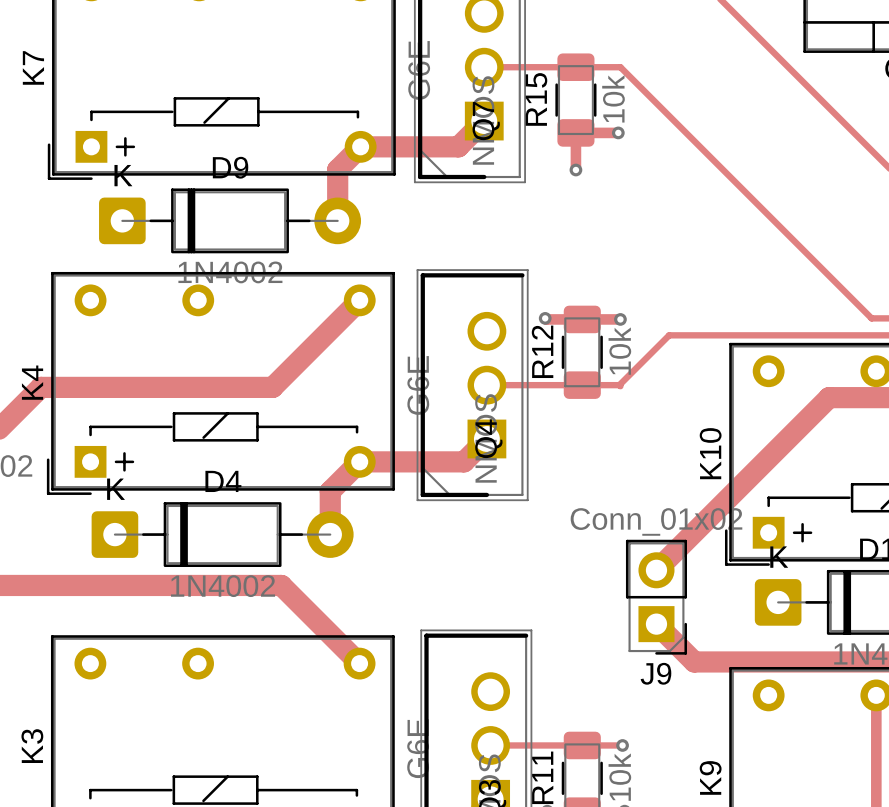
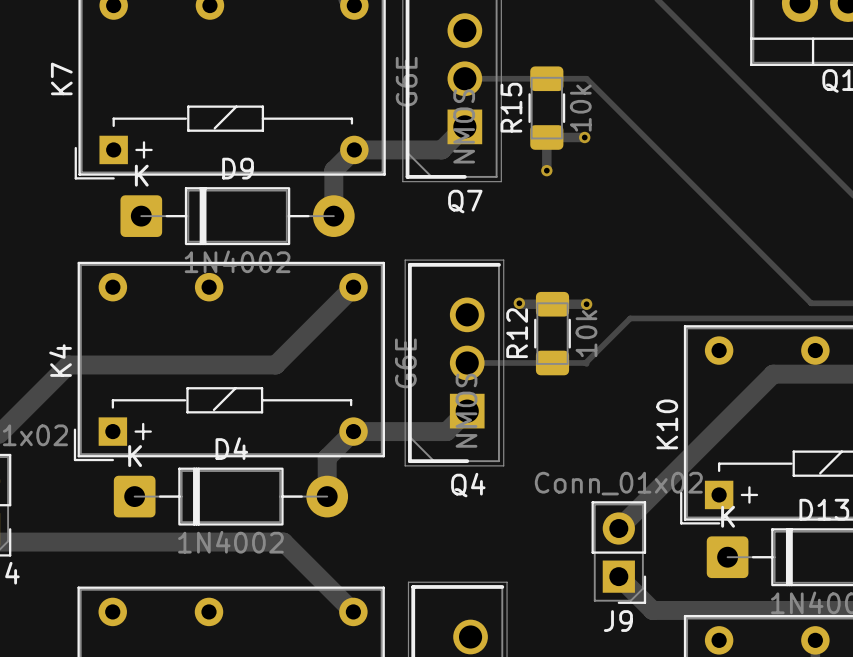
Q7 name rotation: 0° (486, 121) -> 90° clockwise (465, 201)
Q7 name position: Q7 (486, 121) -> Q7 (465, 201)
Q4 name rotation: 0° (488, 438) -> 90° clockwise (468, 485)
Q4 name position: Q4 (488, 438) -> Q4 (468, 485)

